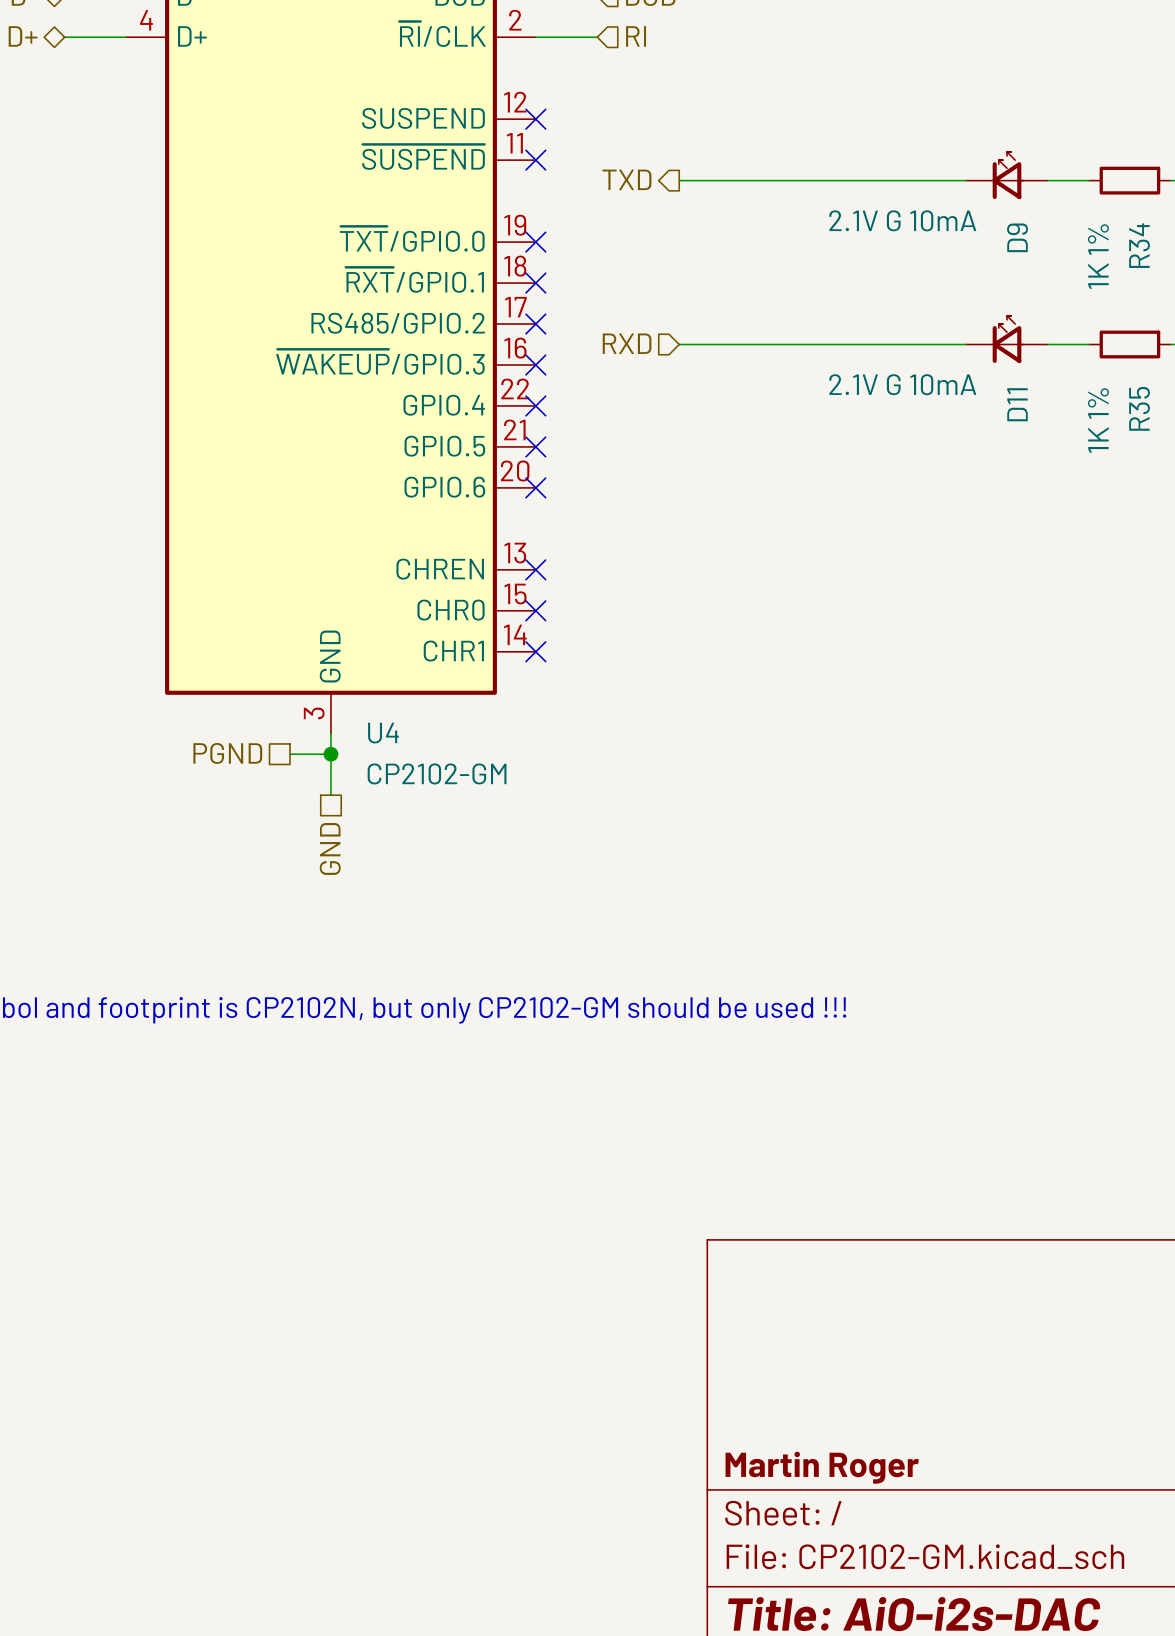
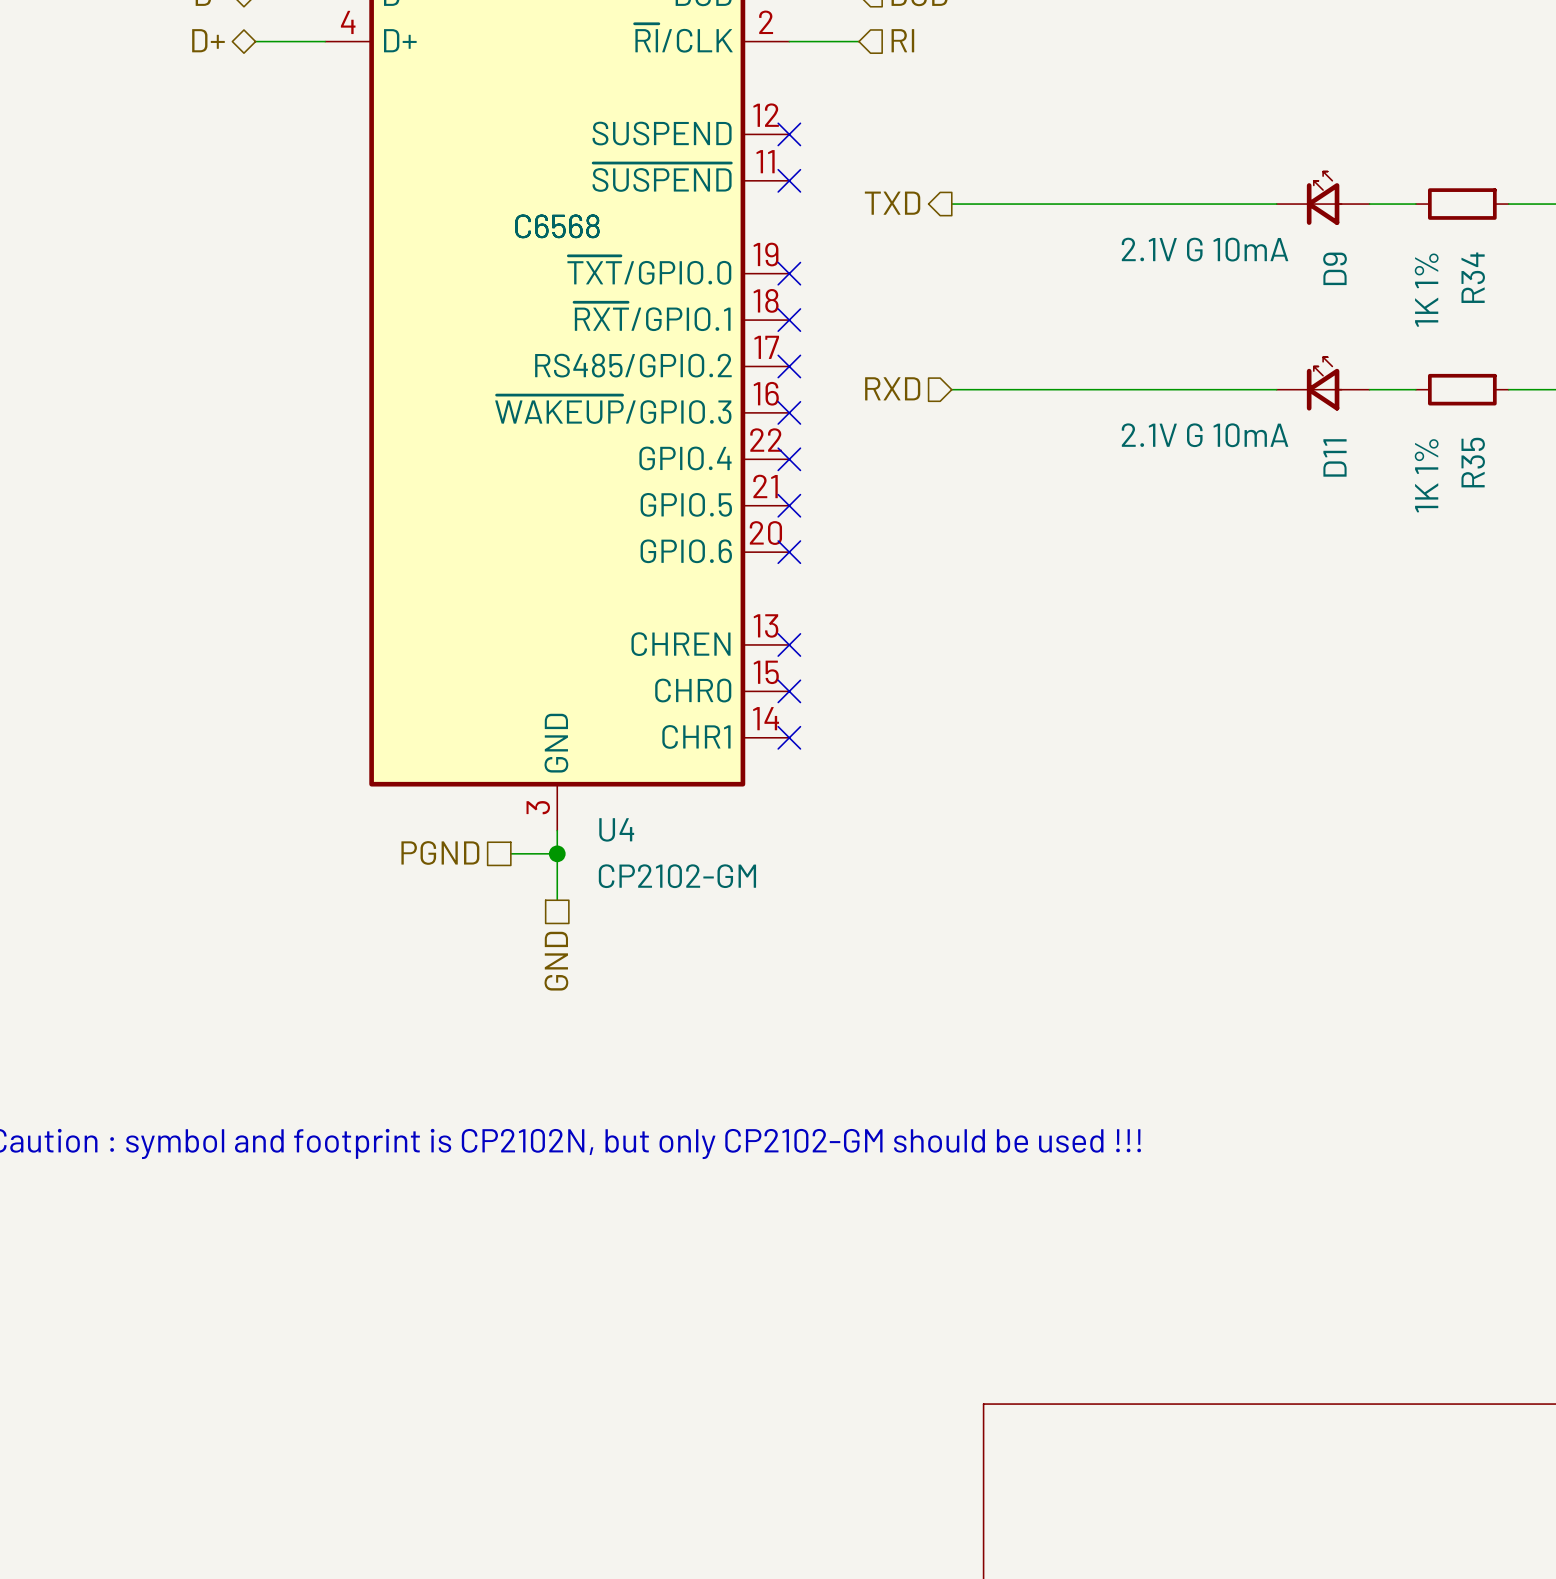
U4 text: none -> C6568 (557, 226)
U4 text: none -> C6568 (557, 226)

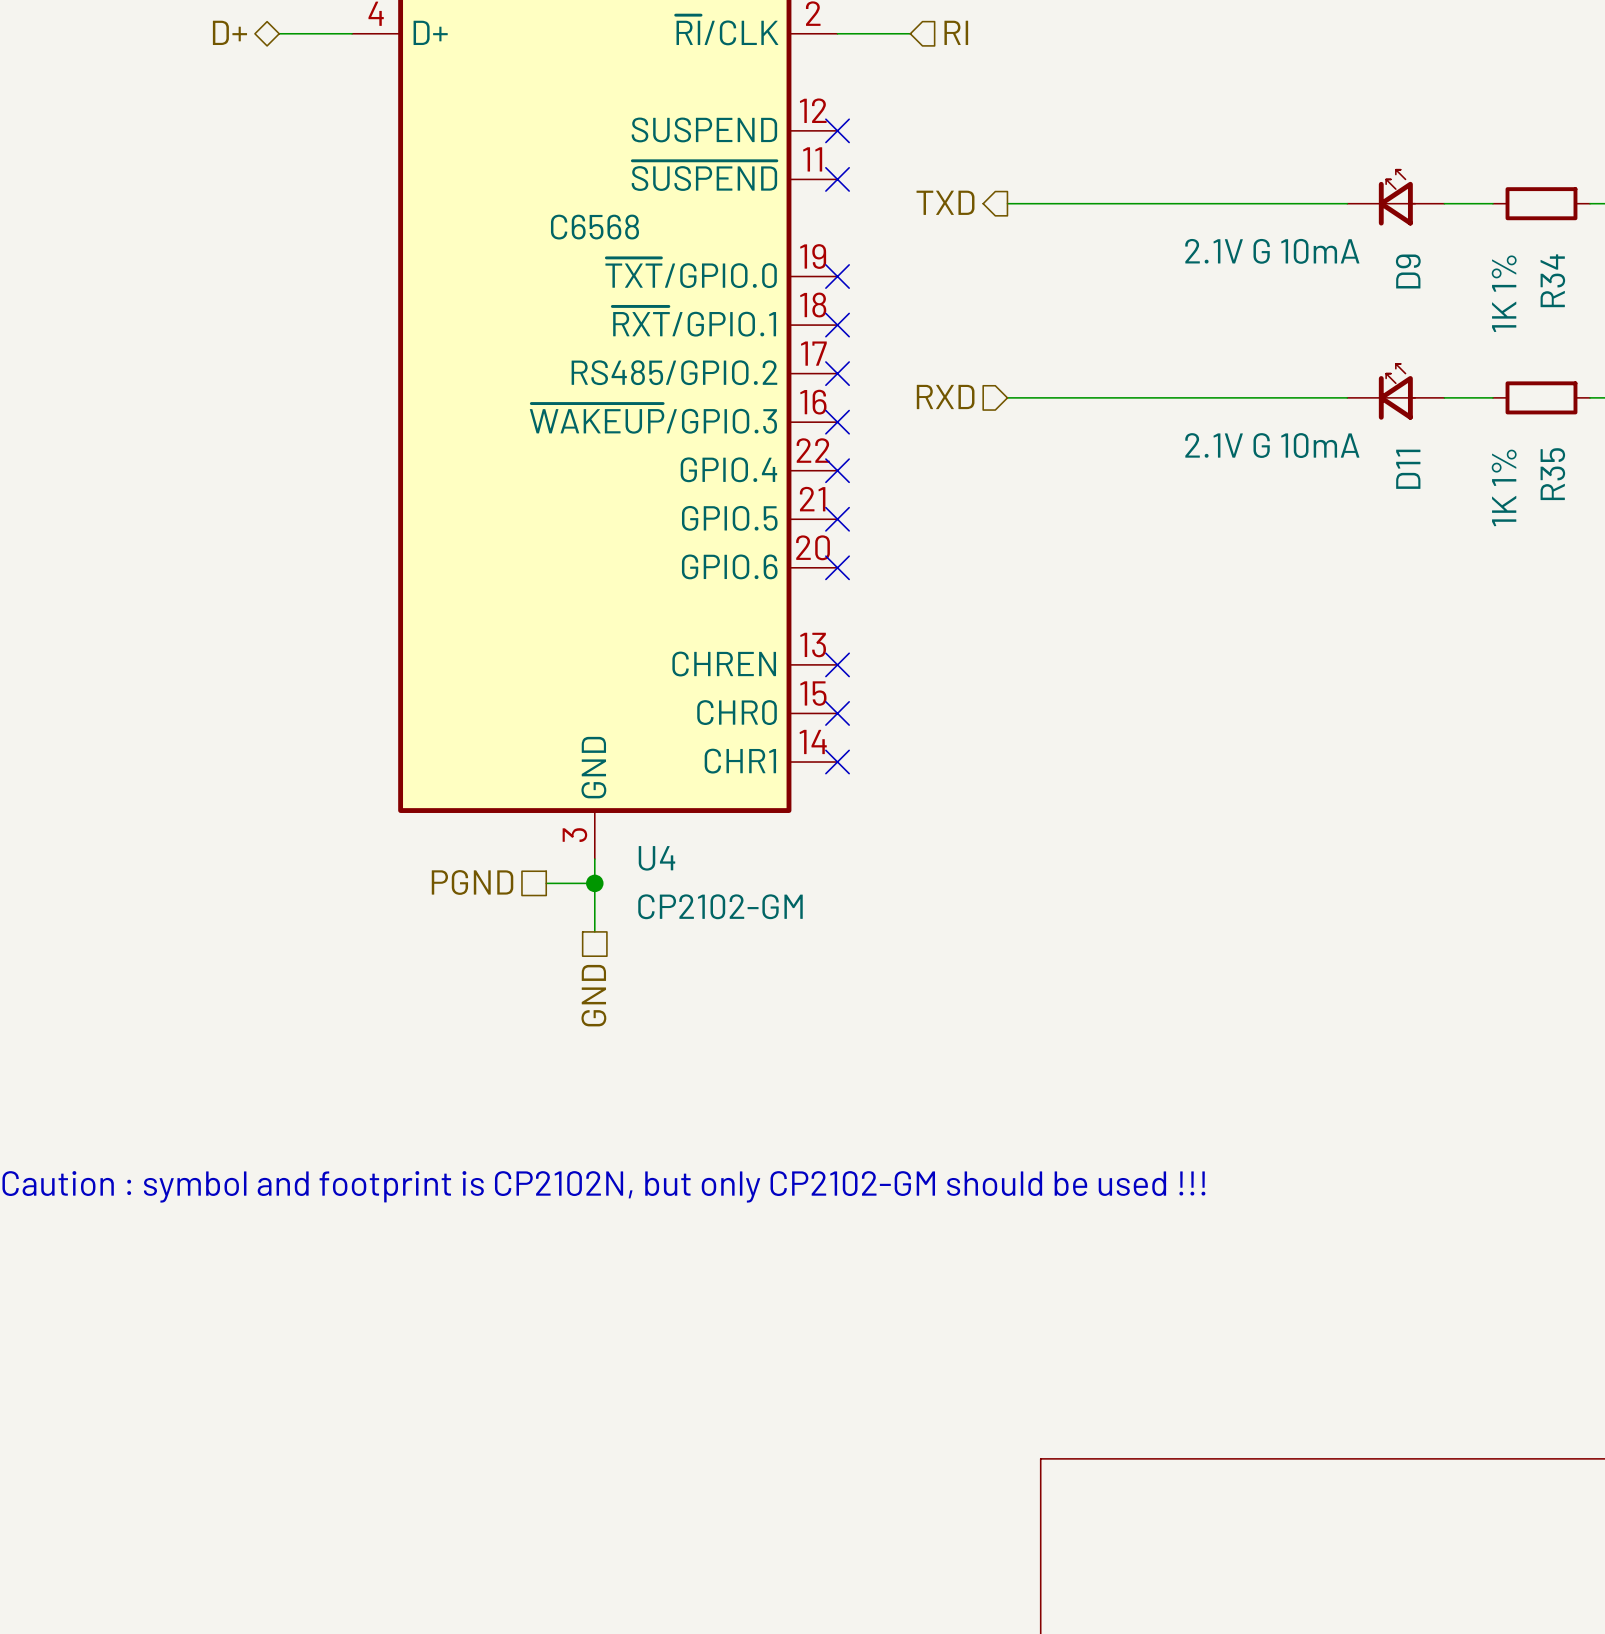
U4 text: C6568 (557, 226) -> none

